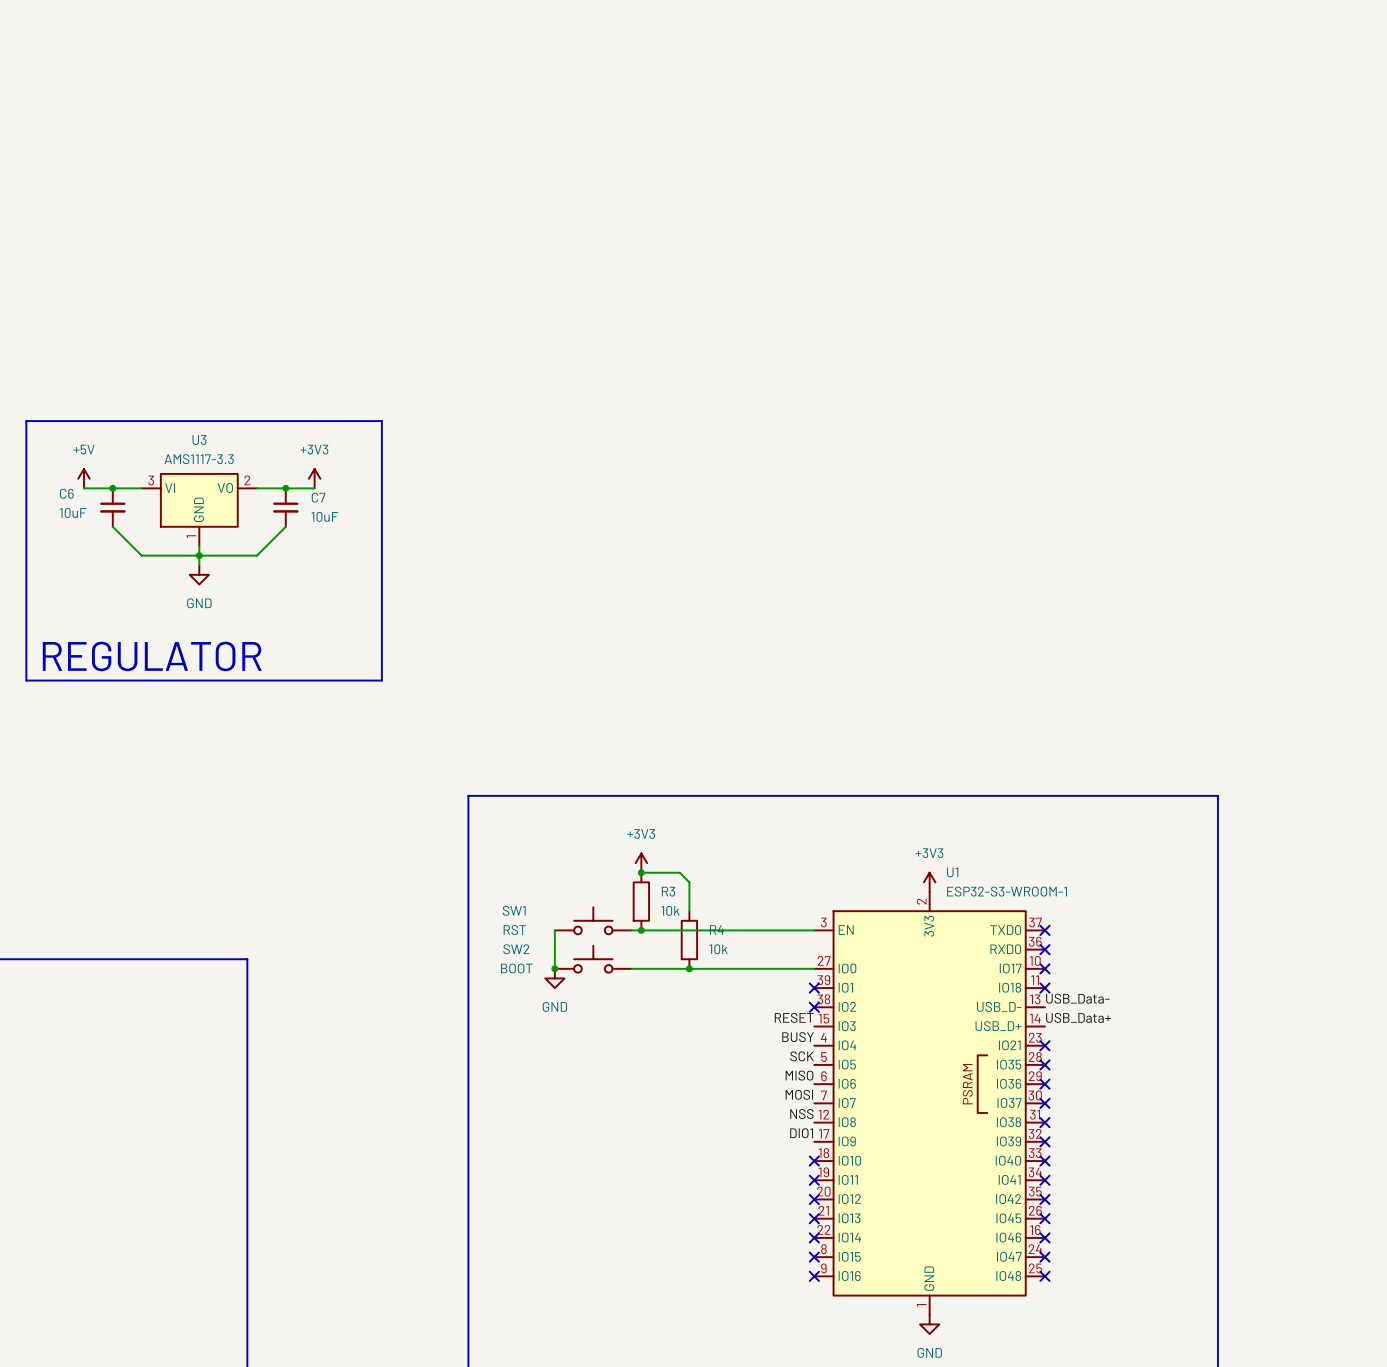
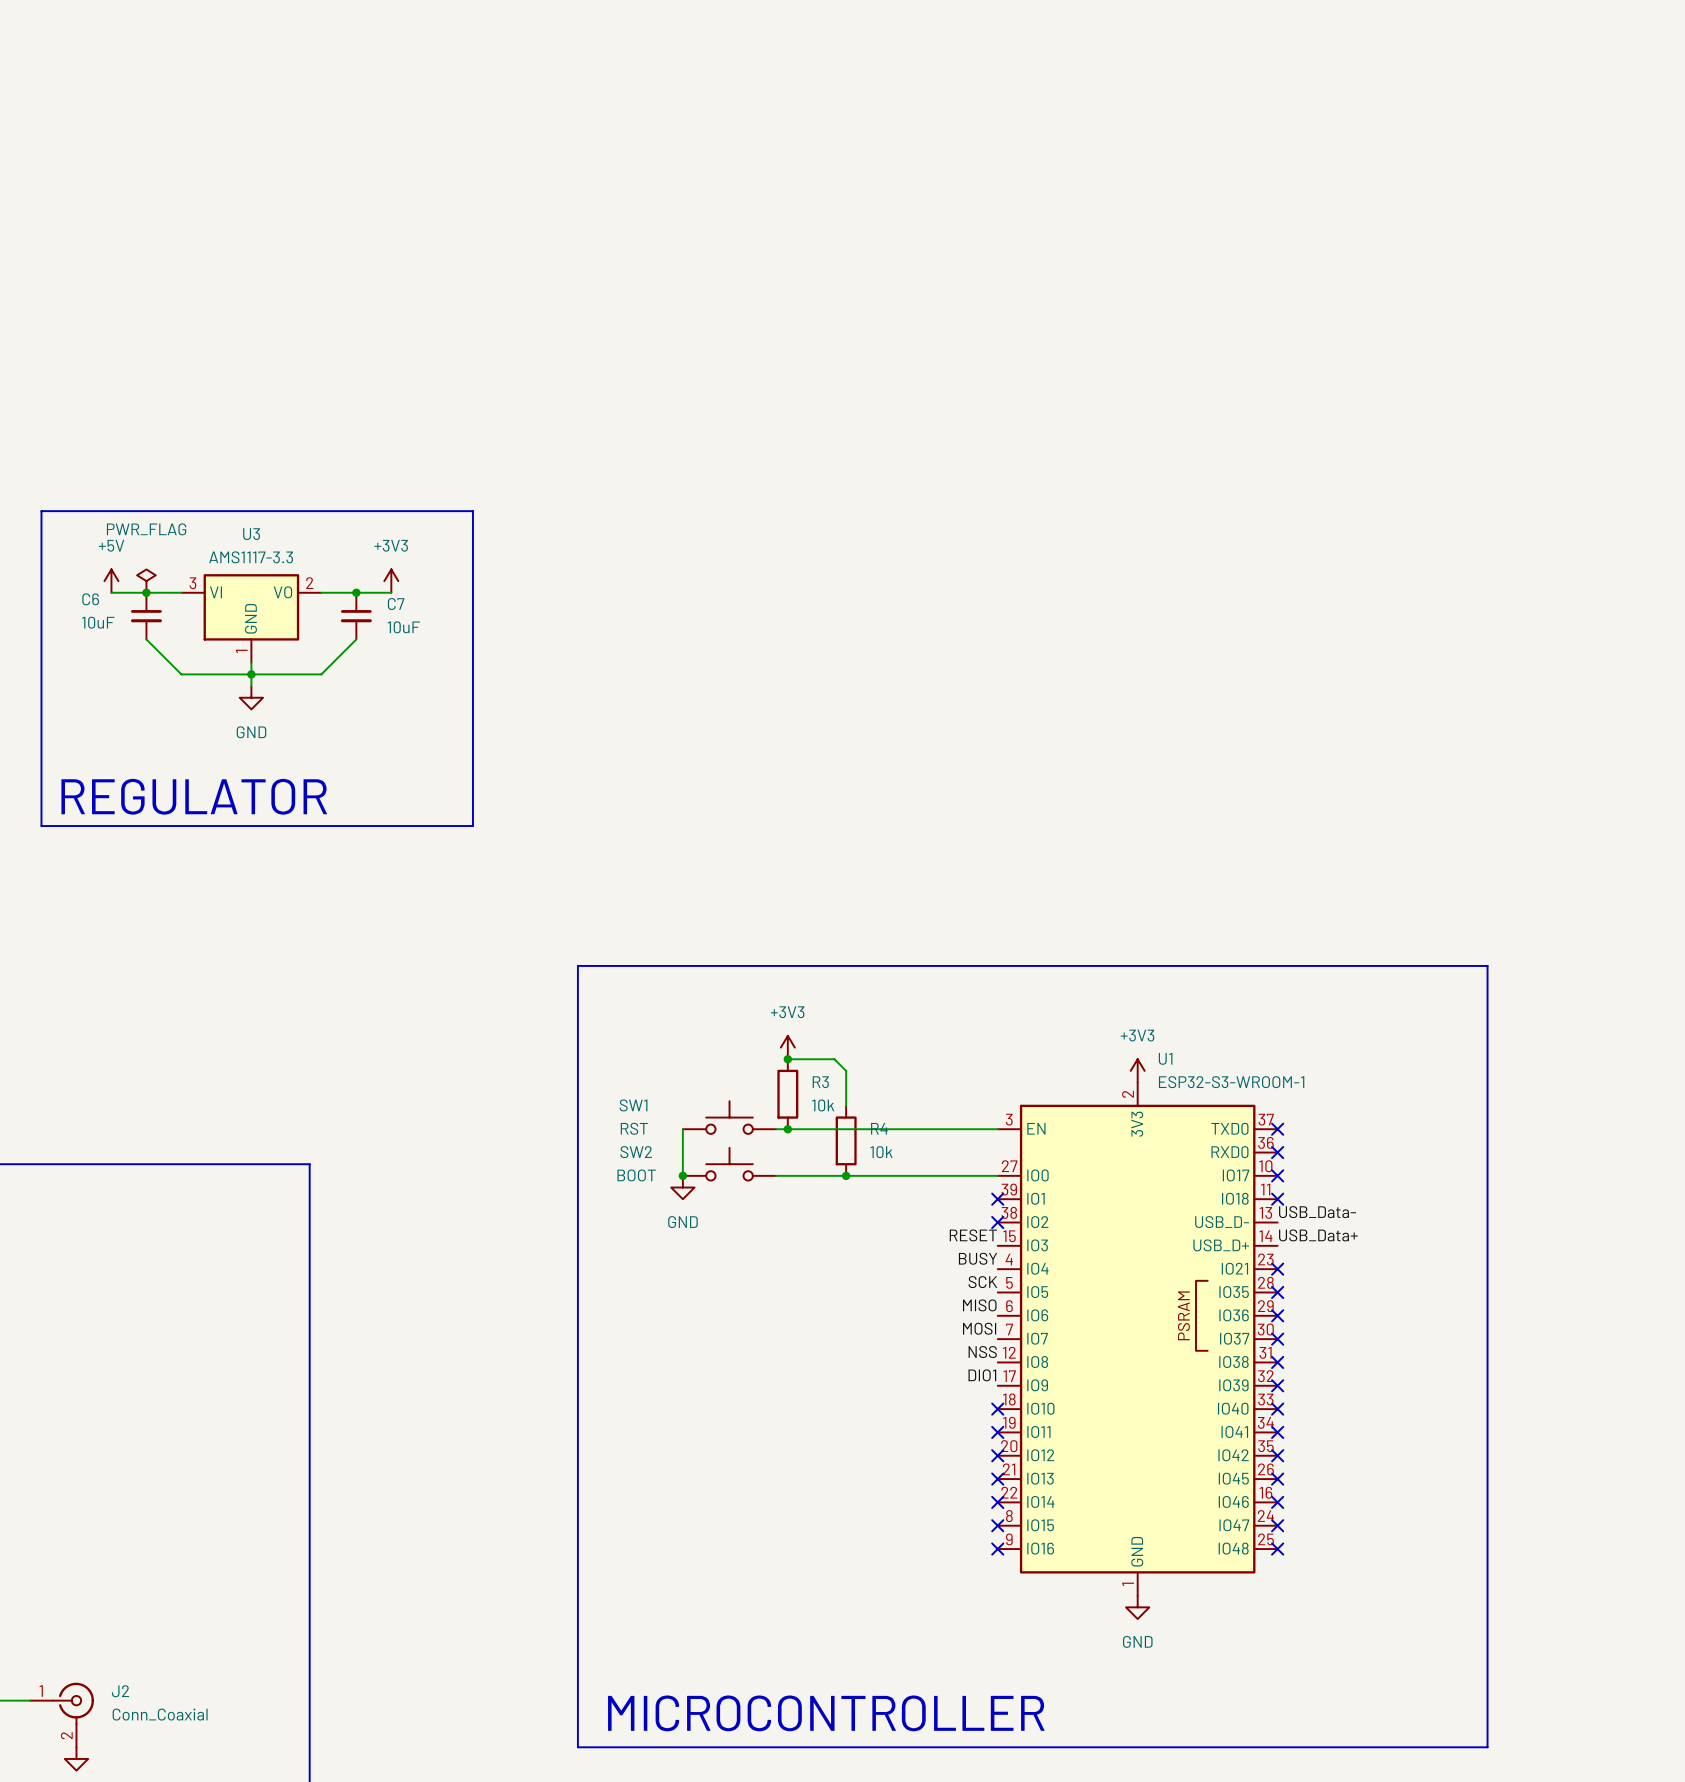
power symbol: none -> PWR_FLAG (146, 581)

